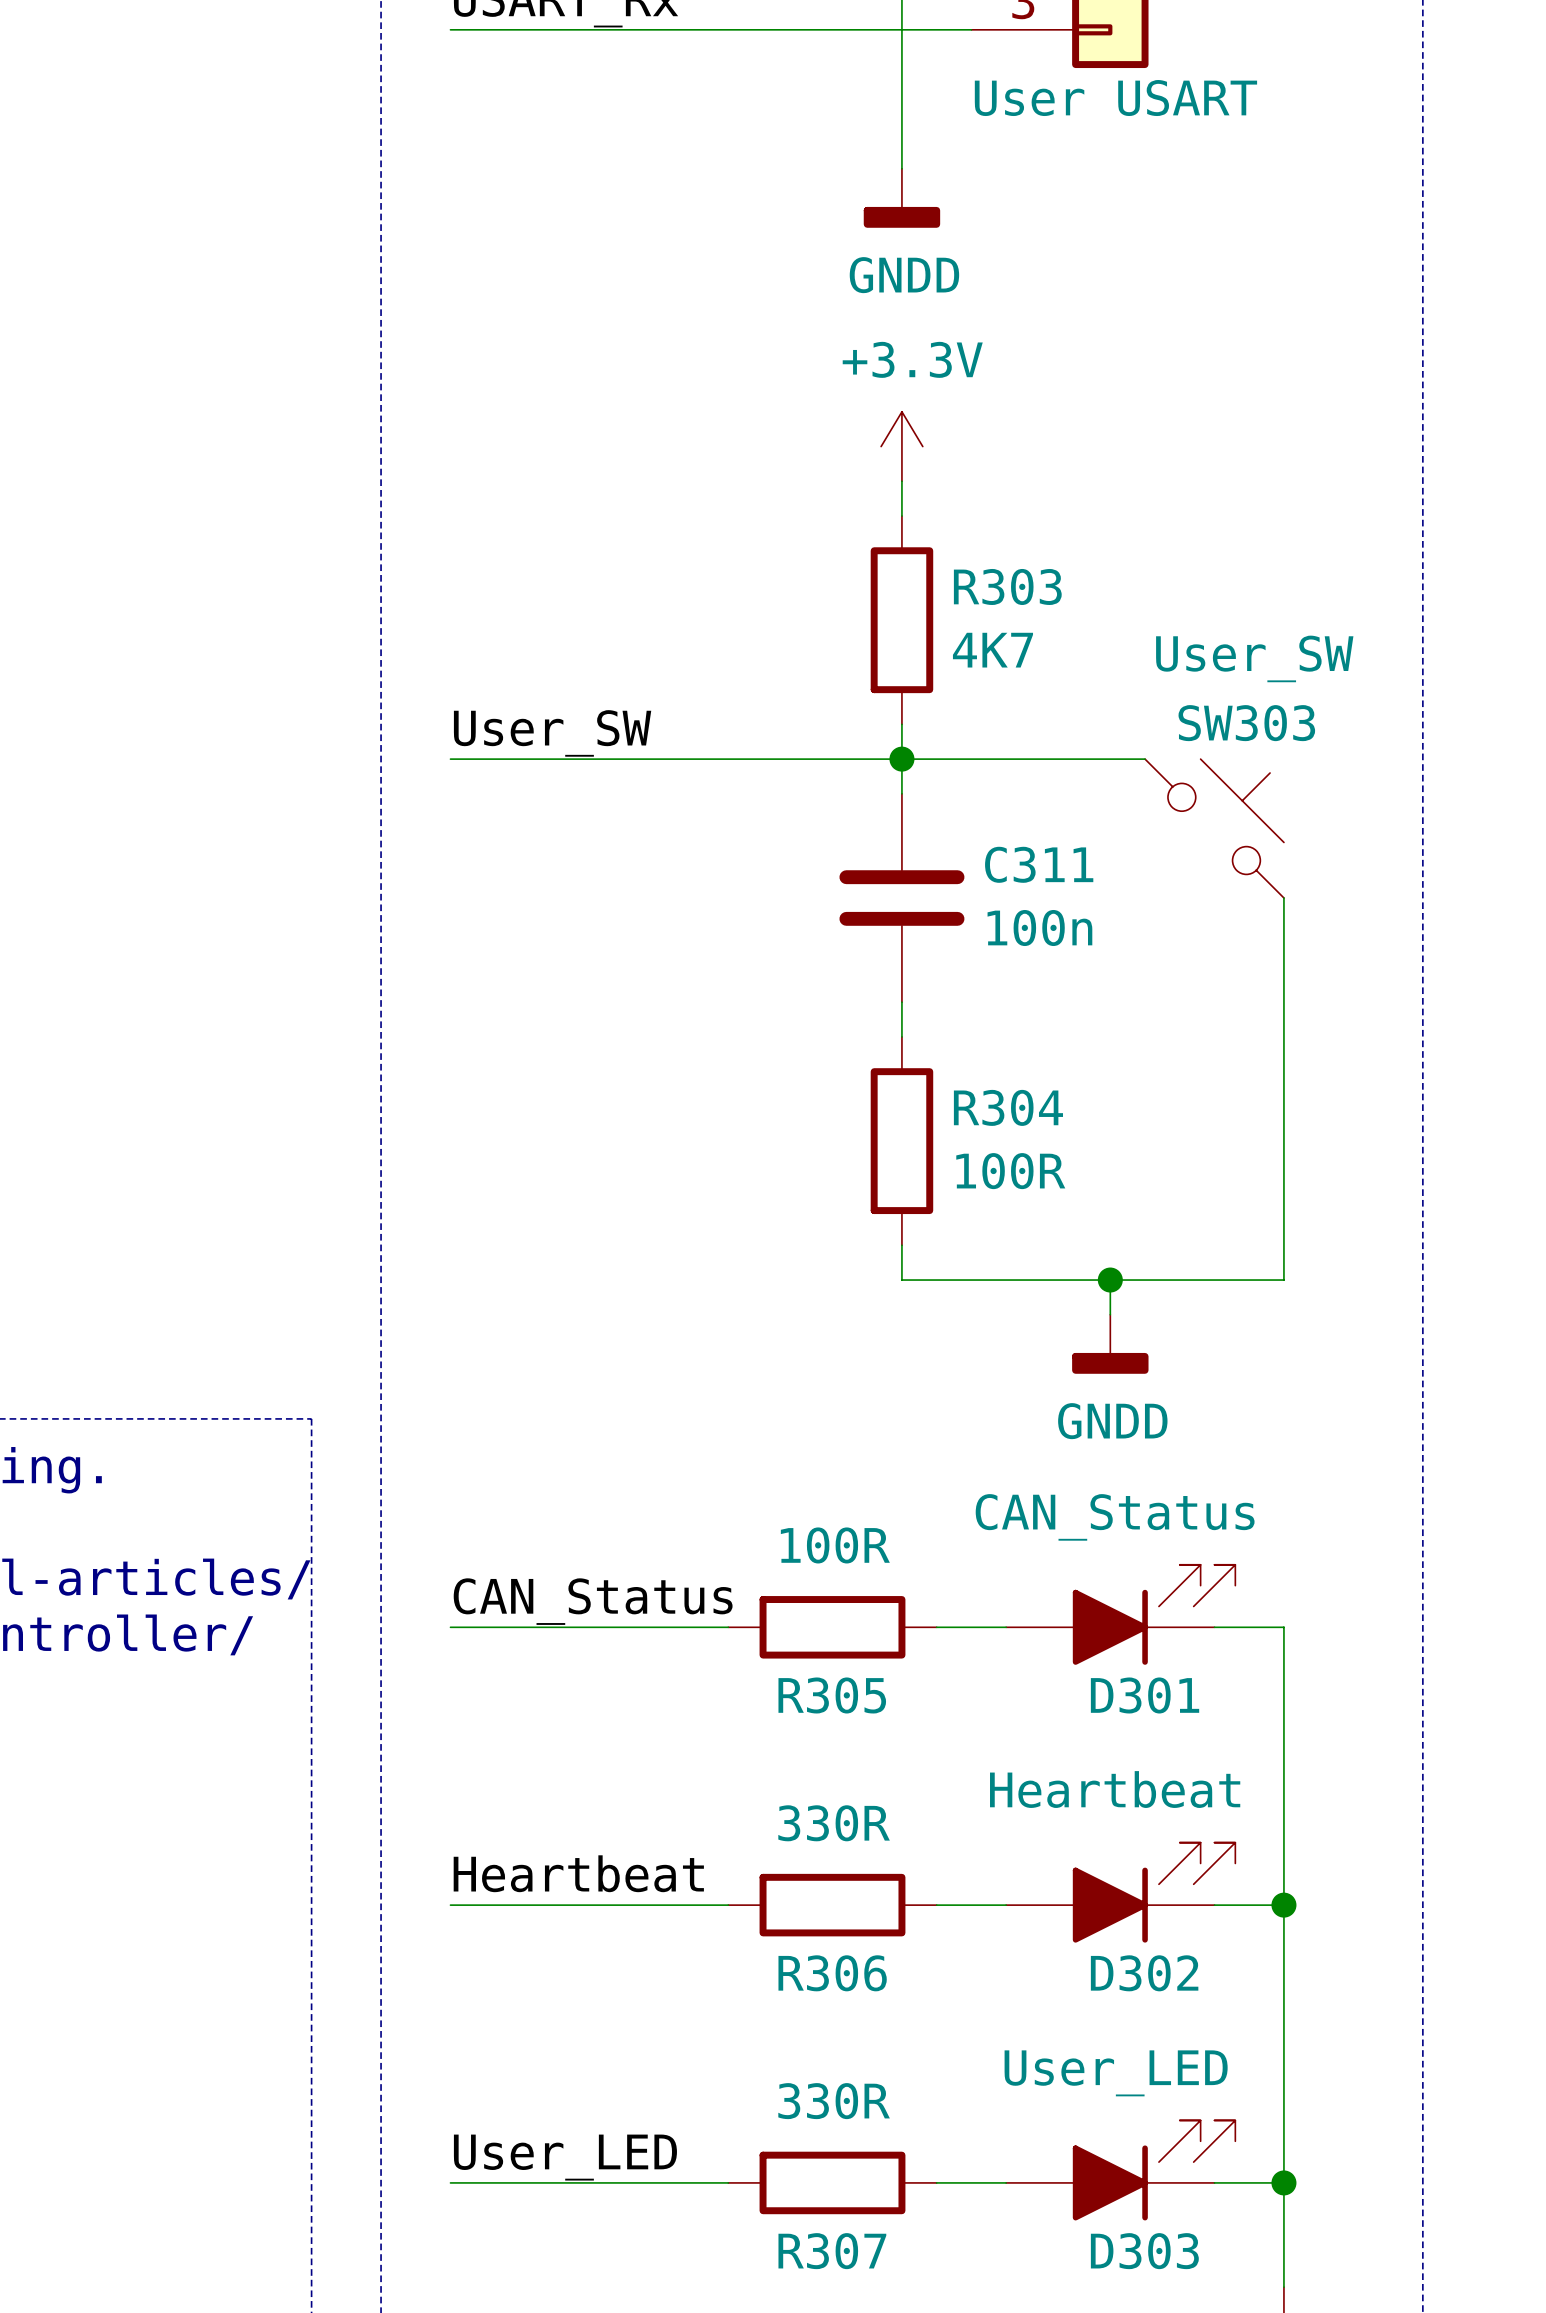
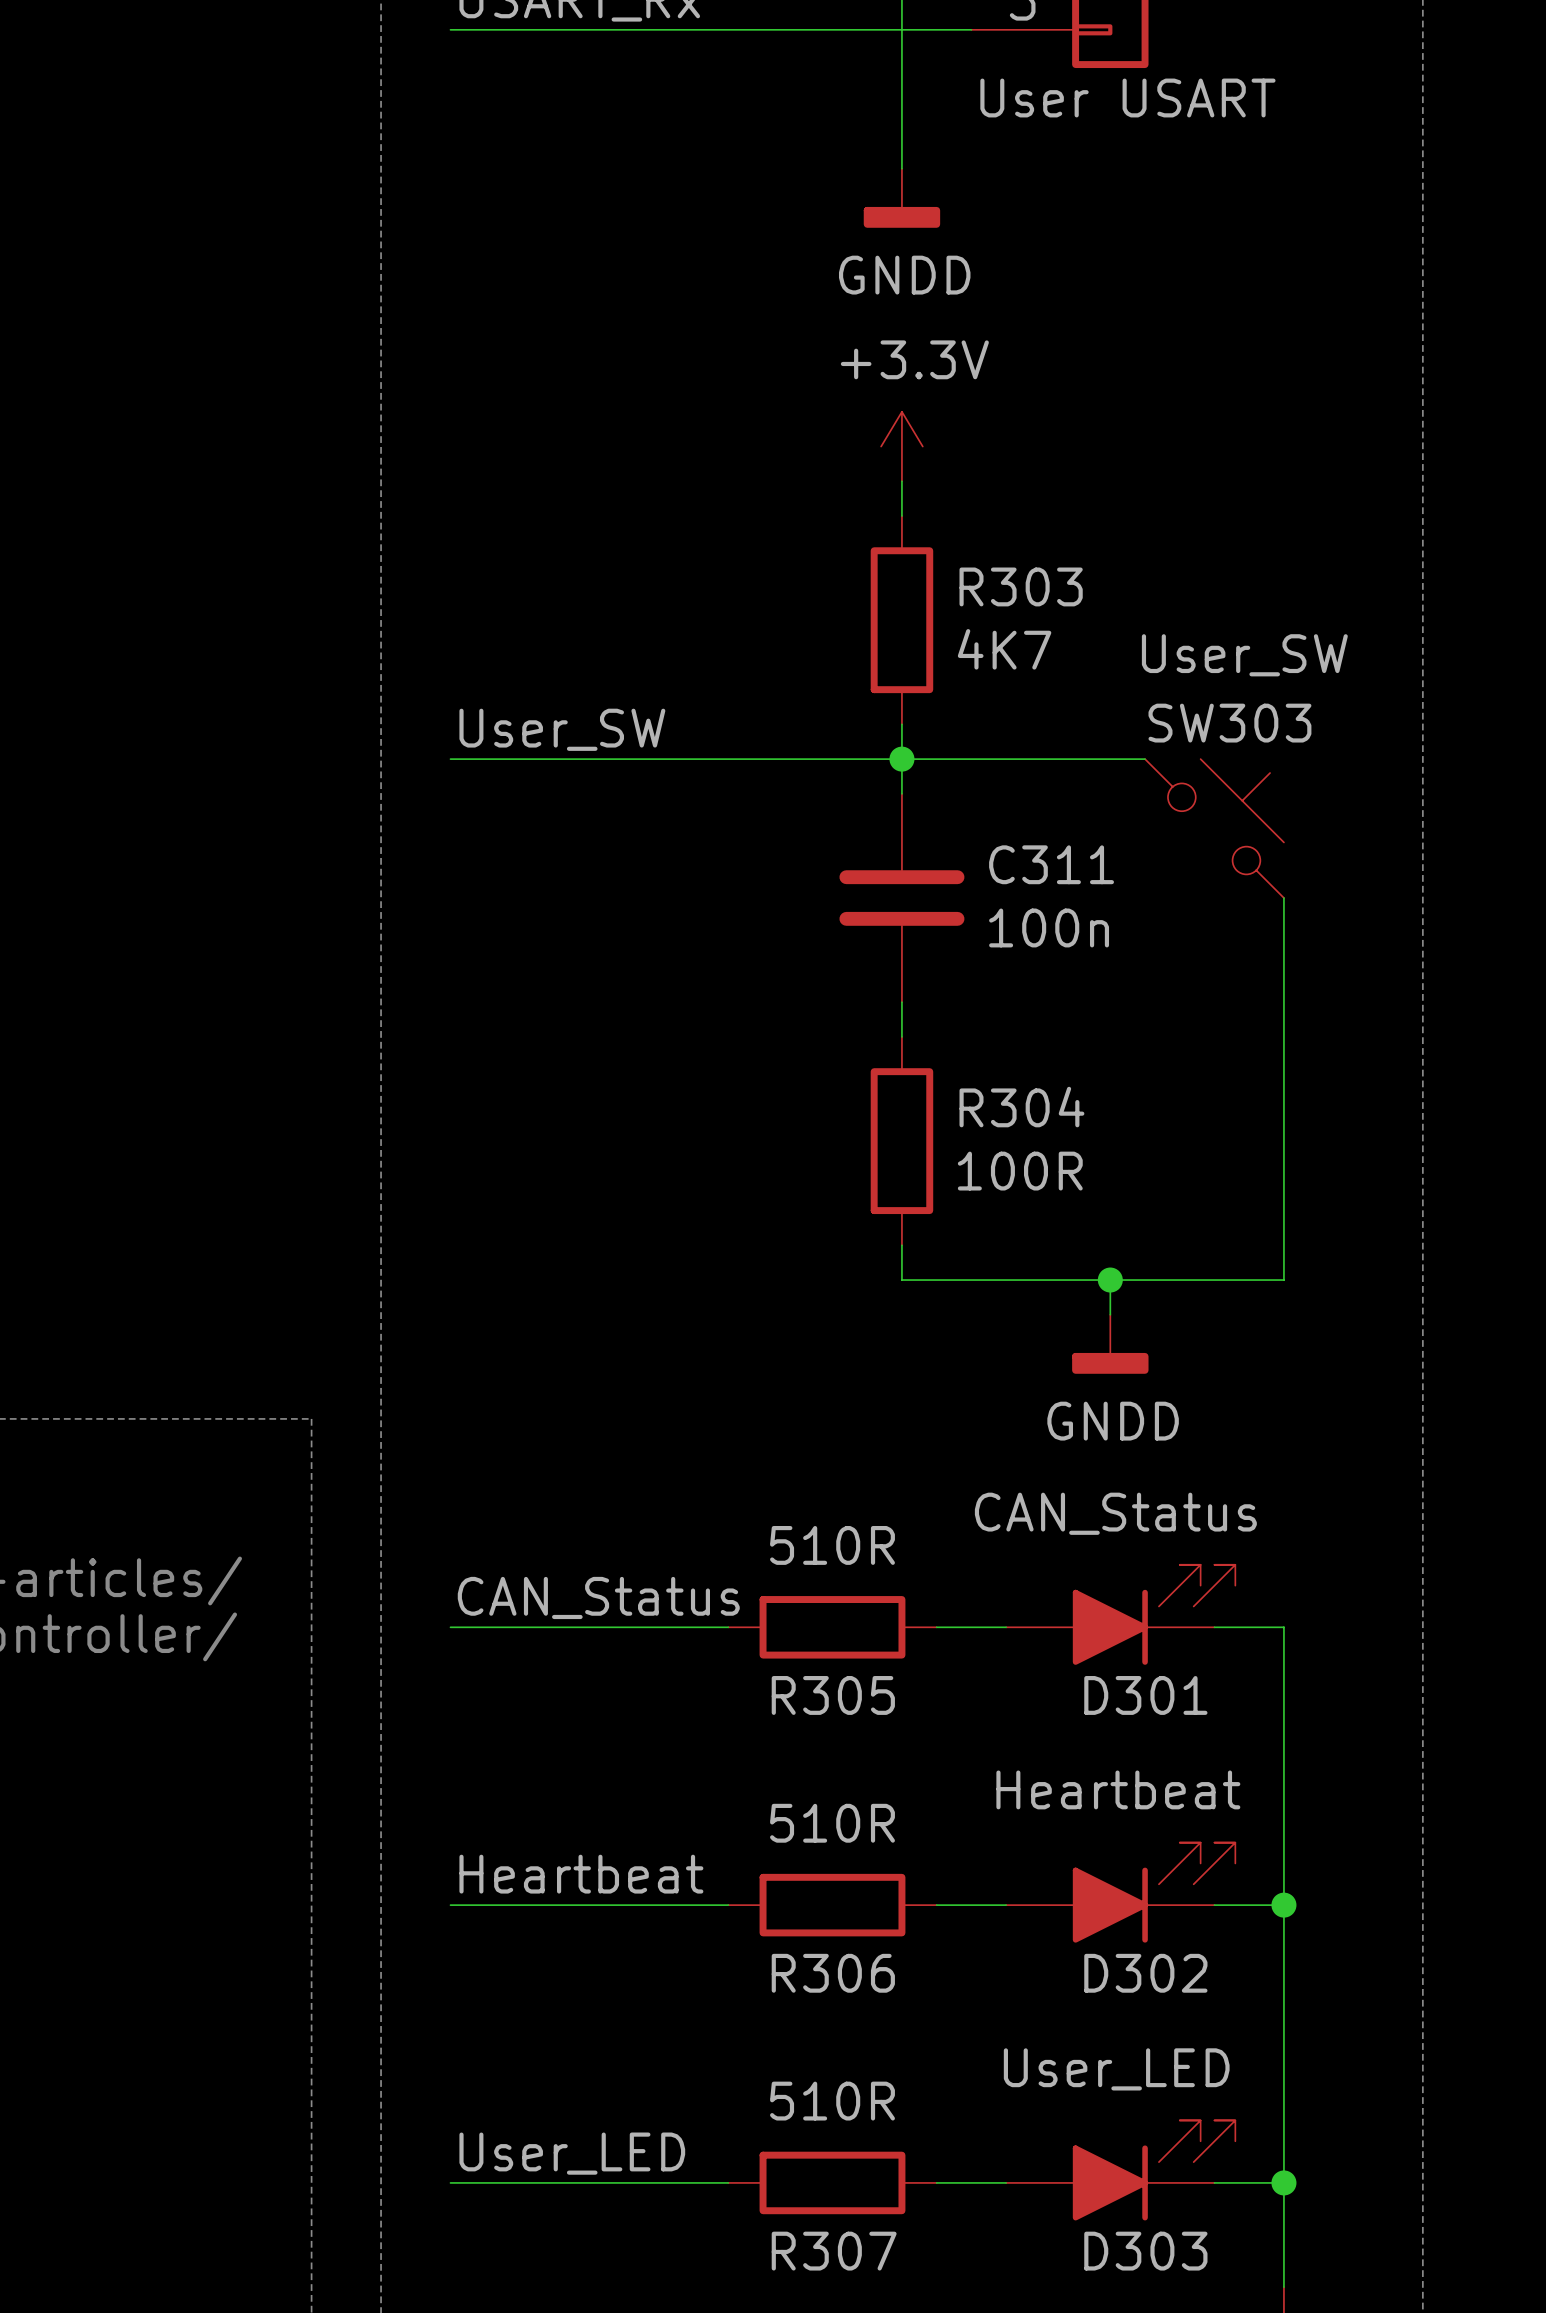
R305 value: 100R (835, 1545) -> 510R (832, 1545)
R306 value: 330R (834, 1823) -> 510R (832, 1823)
R307 value: 330R (834, 2101) -> 510R (832, 2101)

